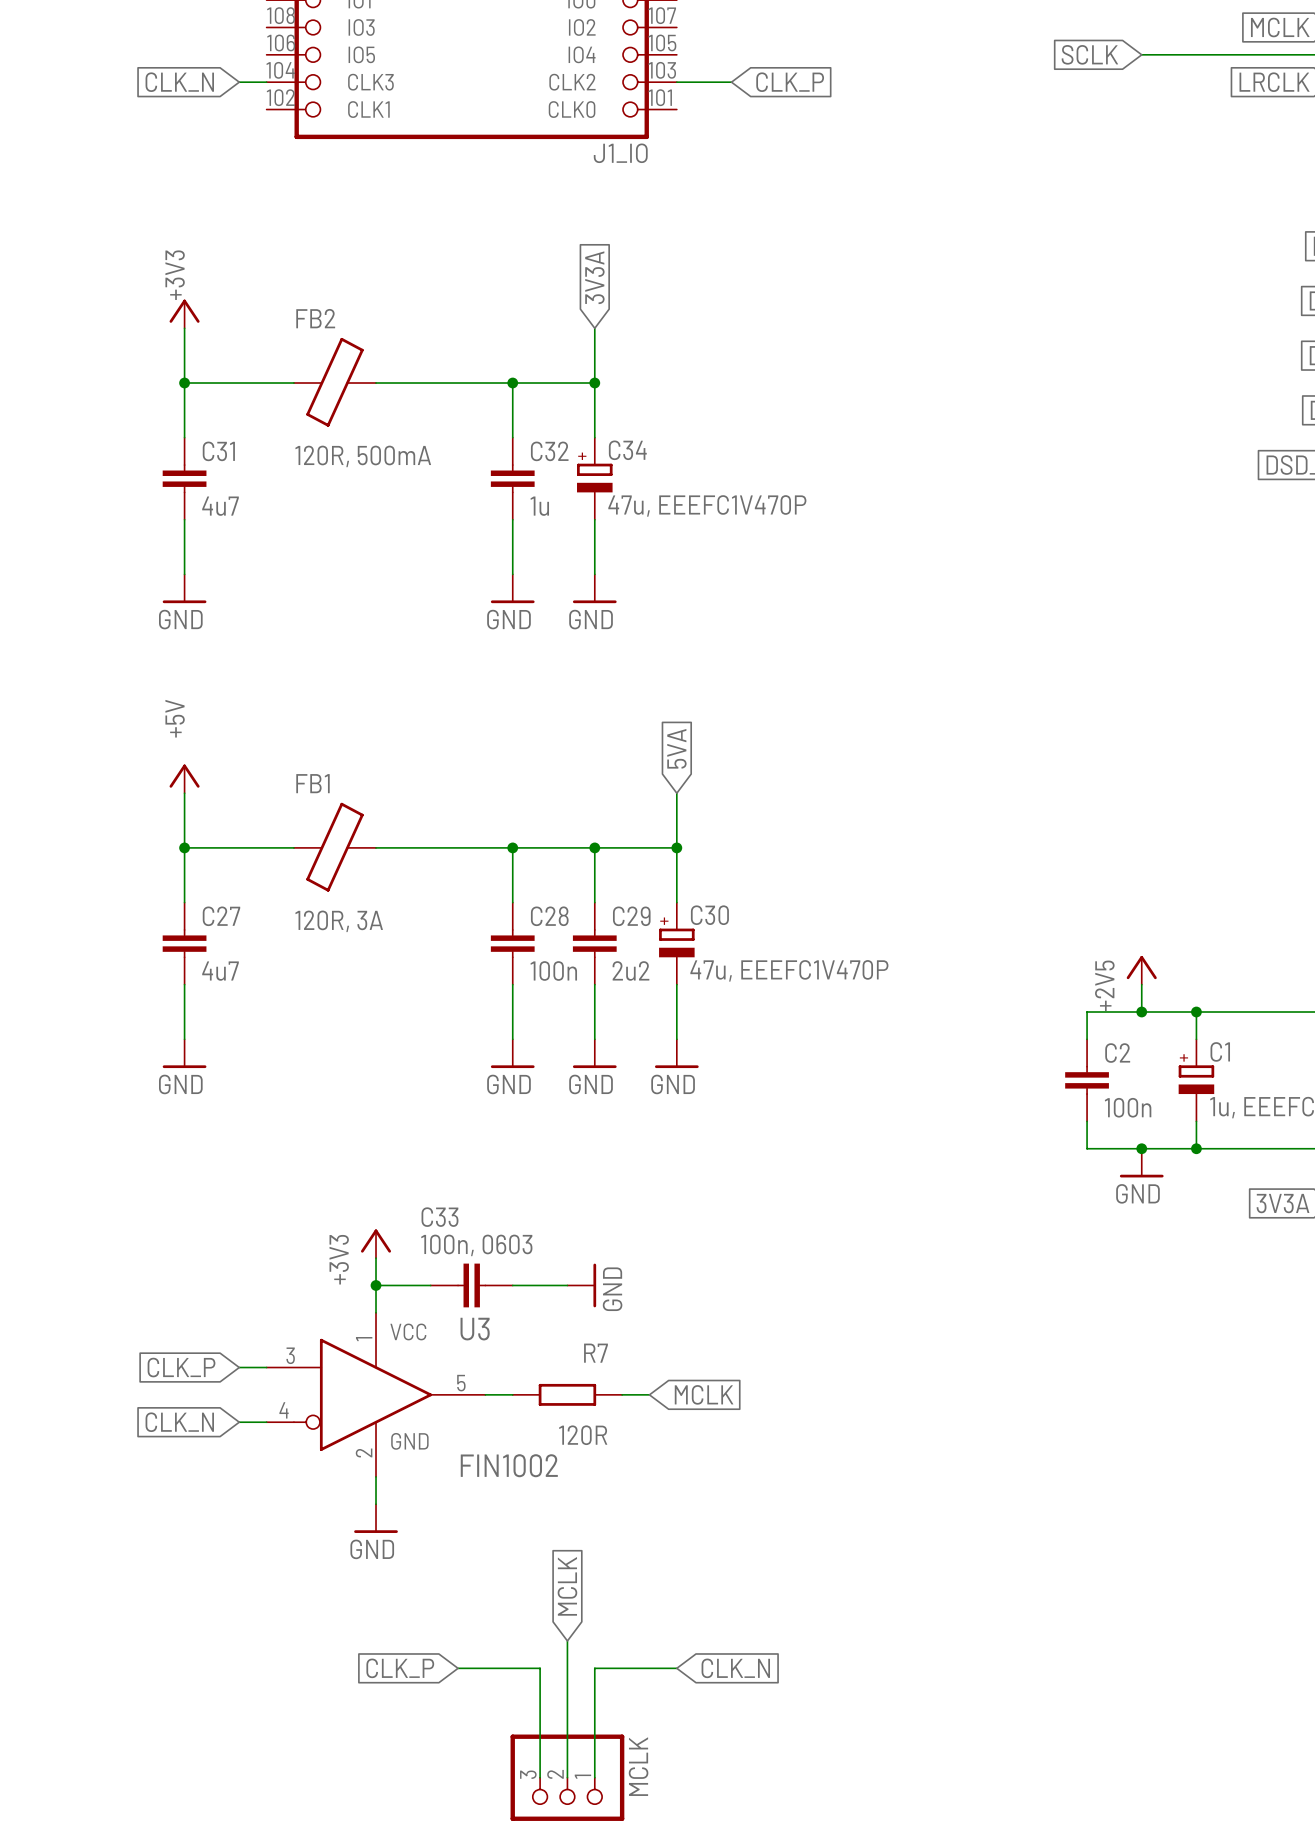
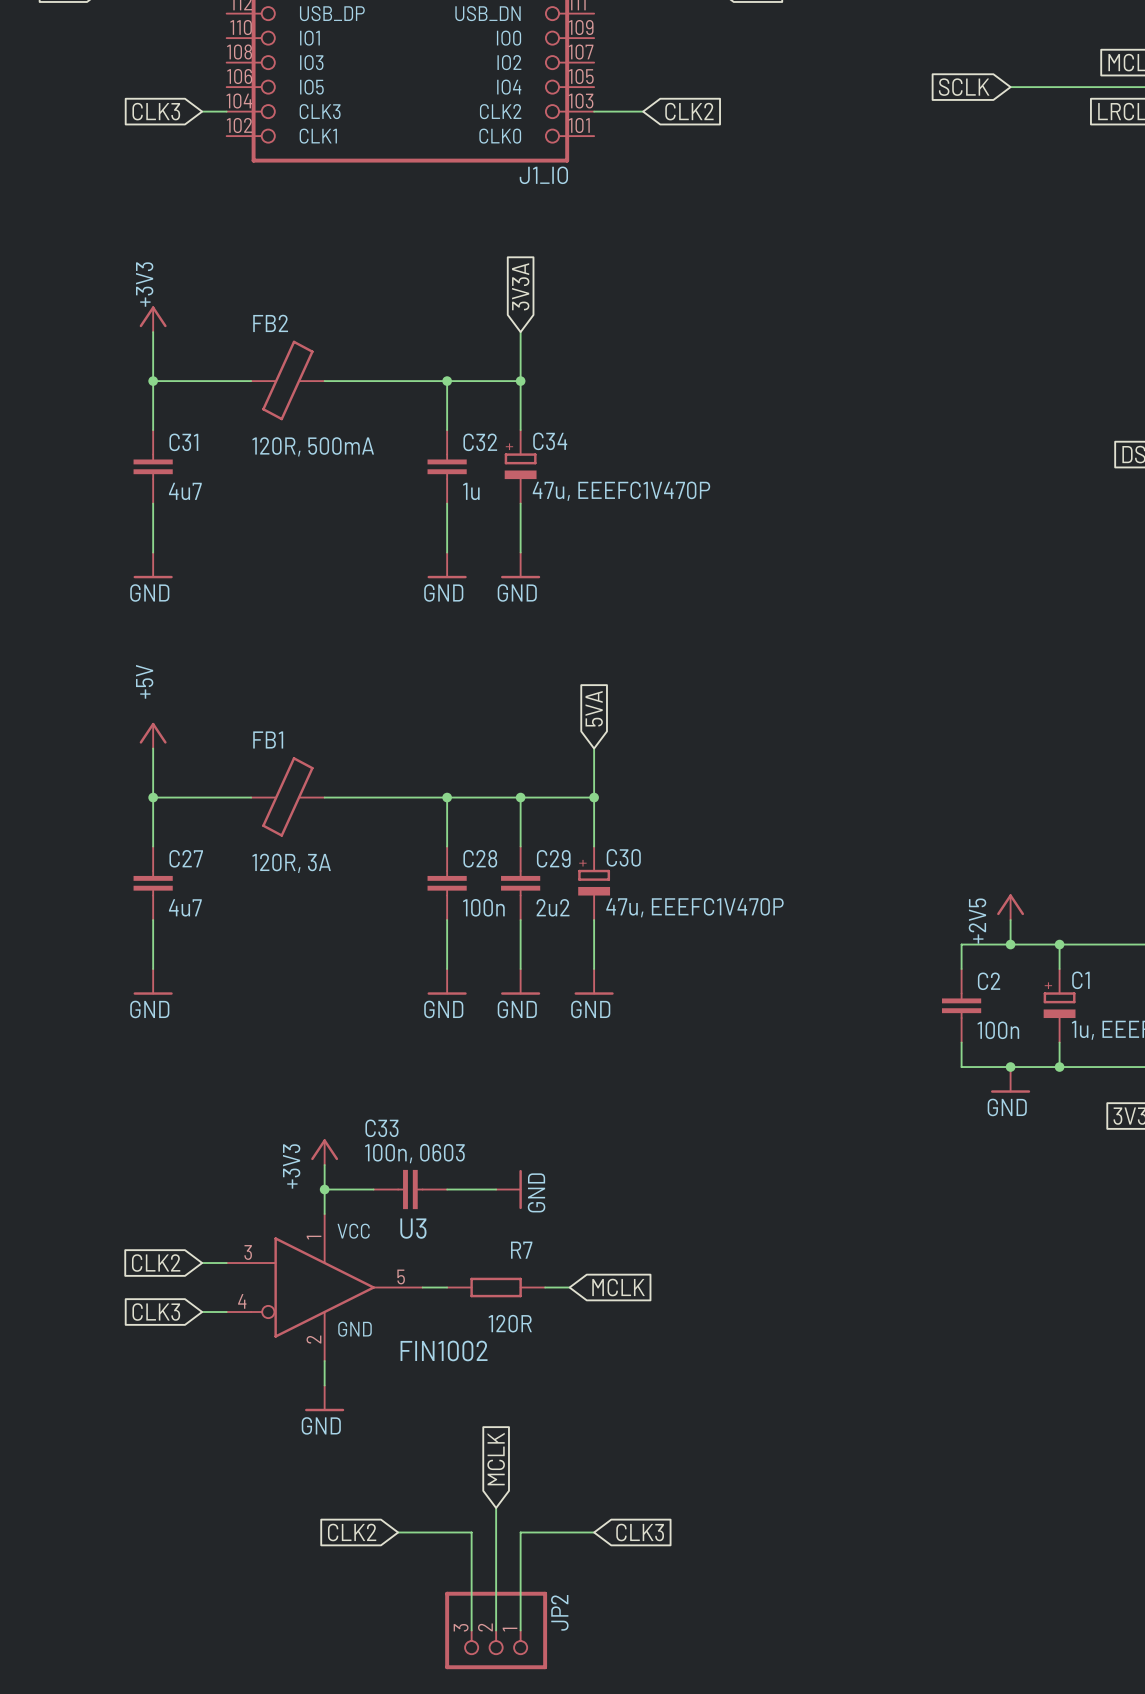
global label: CLK_N (179, 82) -> CLK3 (156, 111)
global label: CLK_P (790, 82) -> CLK2 (689, 111)
global label: CLK_P (181, 1367) -> CLK2 (156, 1263)
global label: CLK_N (179, 1422) -> CLK3 (156, 1312)
global label: CLK_P (400, 1668) -> CLK2 (352, 1532)
global label: CLK_N (735, 1668) -> CLK3 (640, 1532)
MCLK name: MCLK (638, 1766) -> JP2 (559, 1612)

